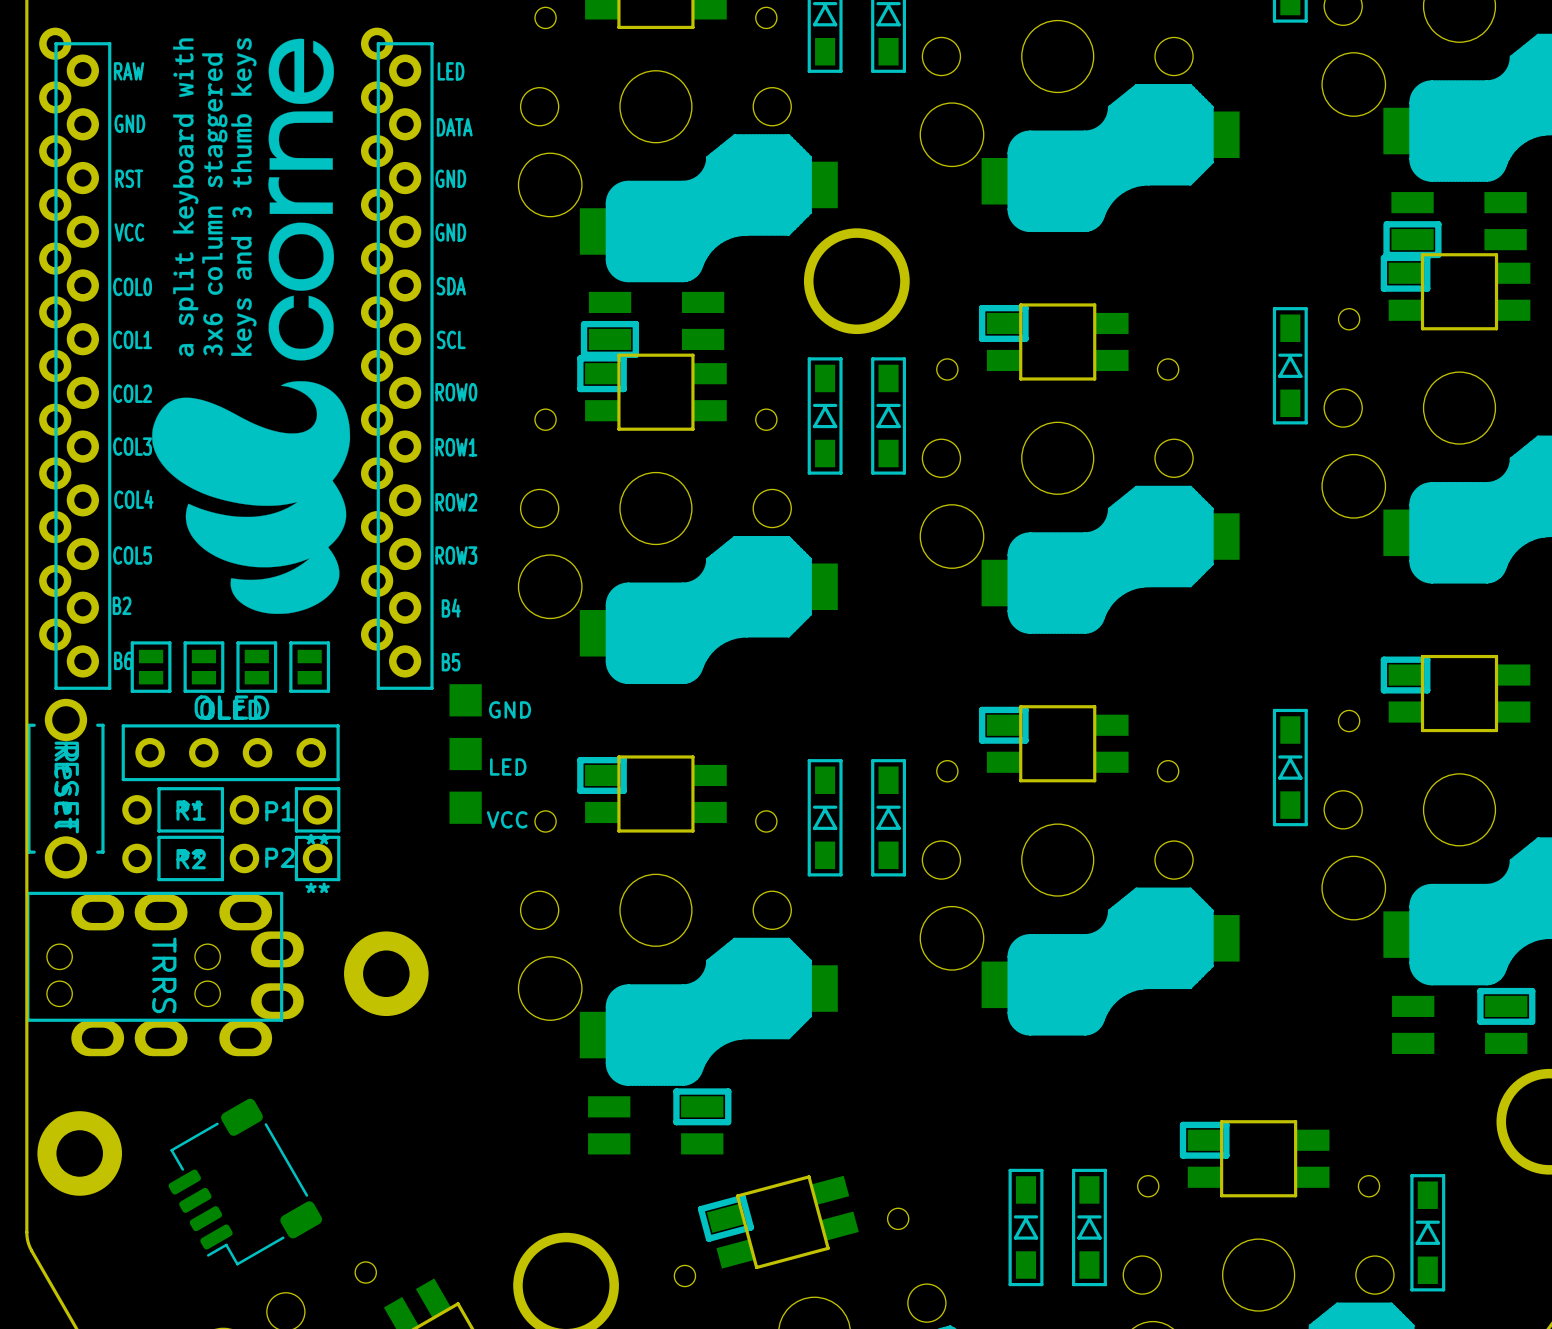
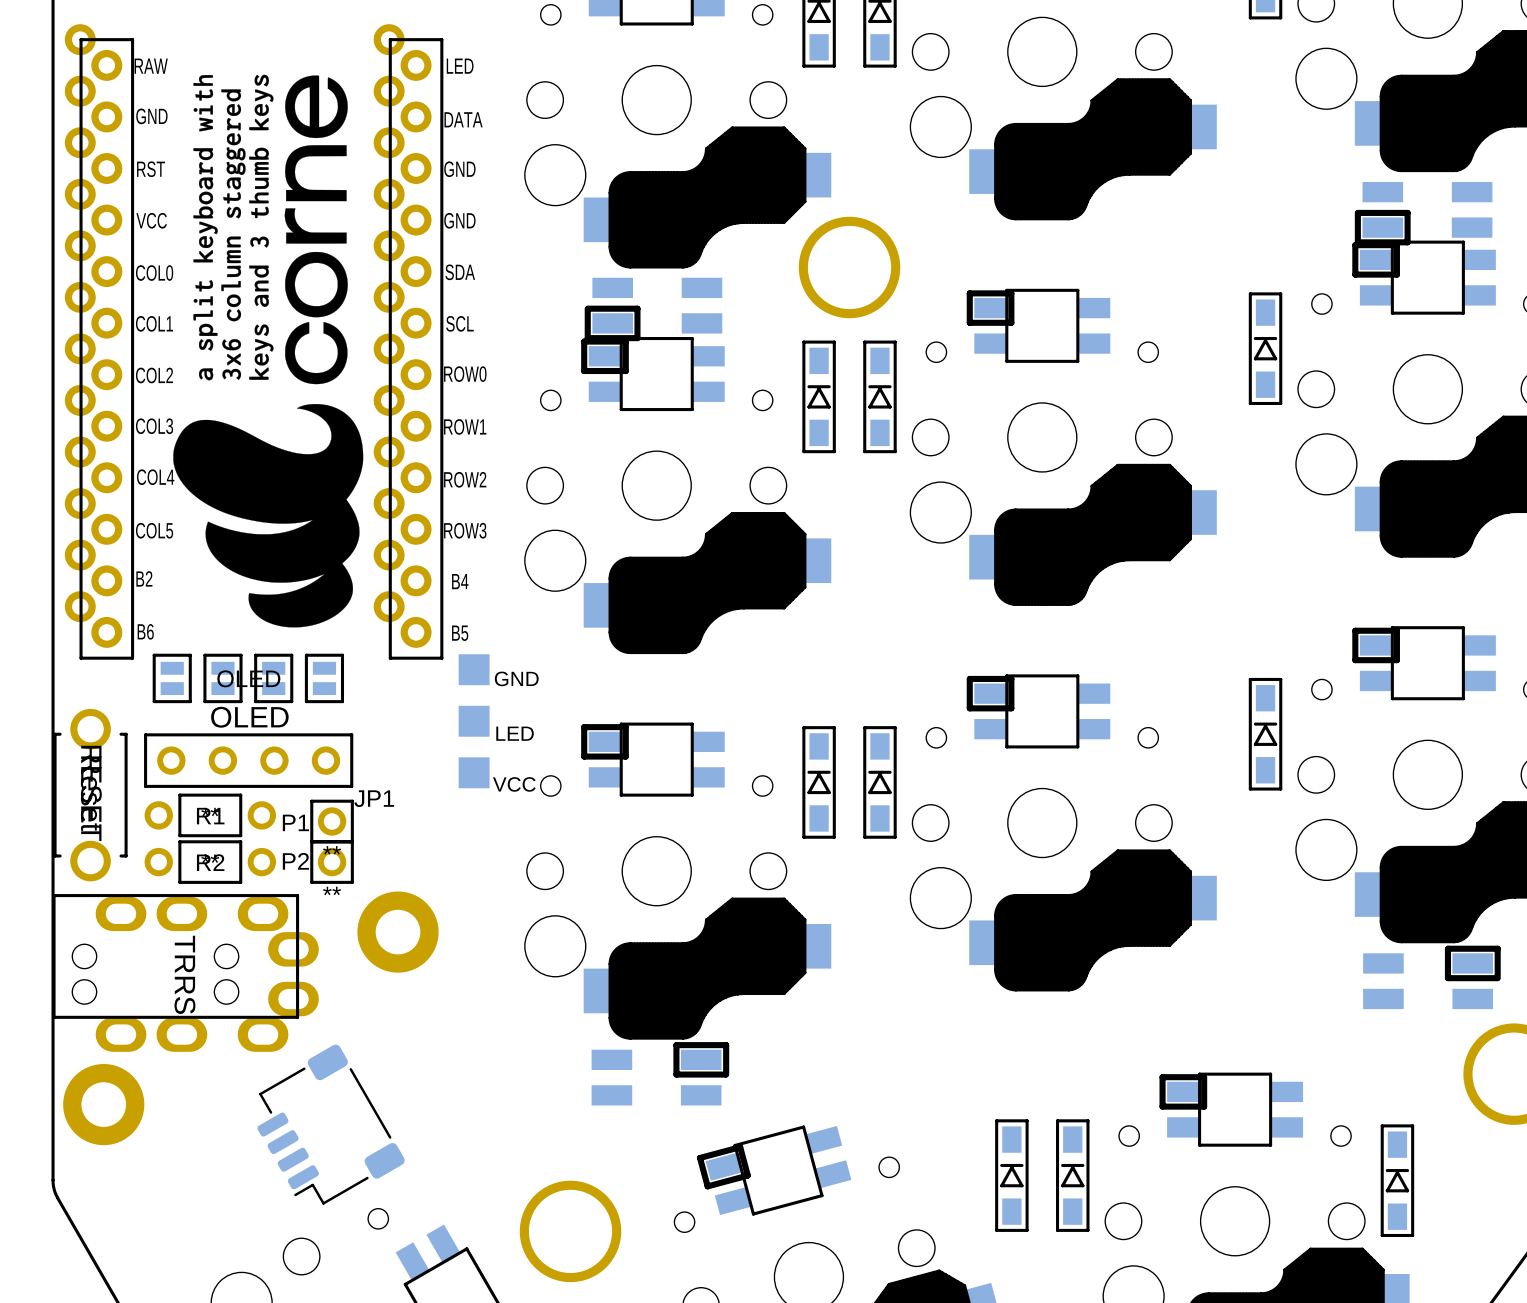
drawing position: (251, 326) -> (268, 351)
part: (151, 667) -> none
part: (203, 667) -> none
part: (256, 667) -> none
part: (309, 667) -> none
part: none -> (172, 678)
part: none -> (222, 678)
part: none -> (273, 678)
part: none -> (324, 678)
part position: (230, 752) -> (248, 760)
part position: (65, 788) -> (90, 795)
part: (190, 809) -> none
part: (317, 809) -> none
JP1: none -> (374, 798)
part footprint: [122, 835, 260, 882] -> [144, 793, 277, 838]
part text: P2 (279, 857) -> none
part text: none -> P1 (295, 822)
part: none -> (210, 862)
part: none -> (332, 862)
part position: (165, 973) -> (185, 972)
part position: (245, 1182) -> (331, 1124)

